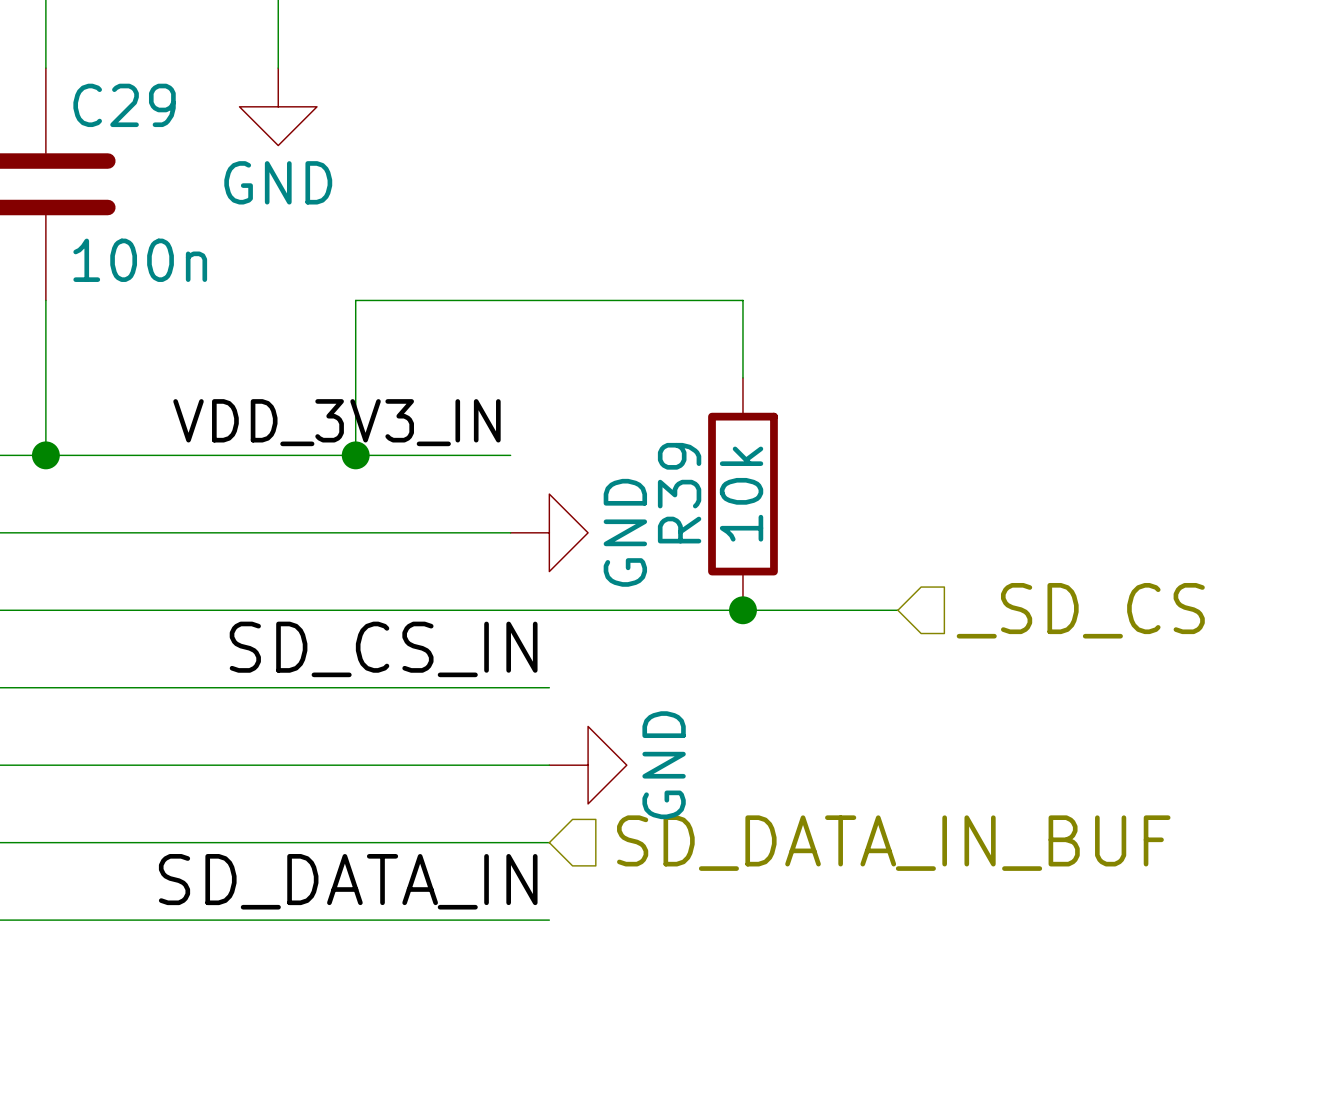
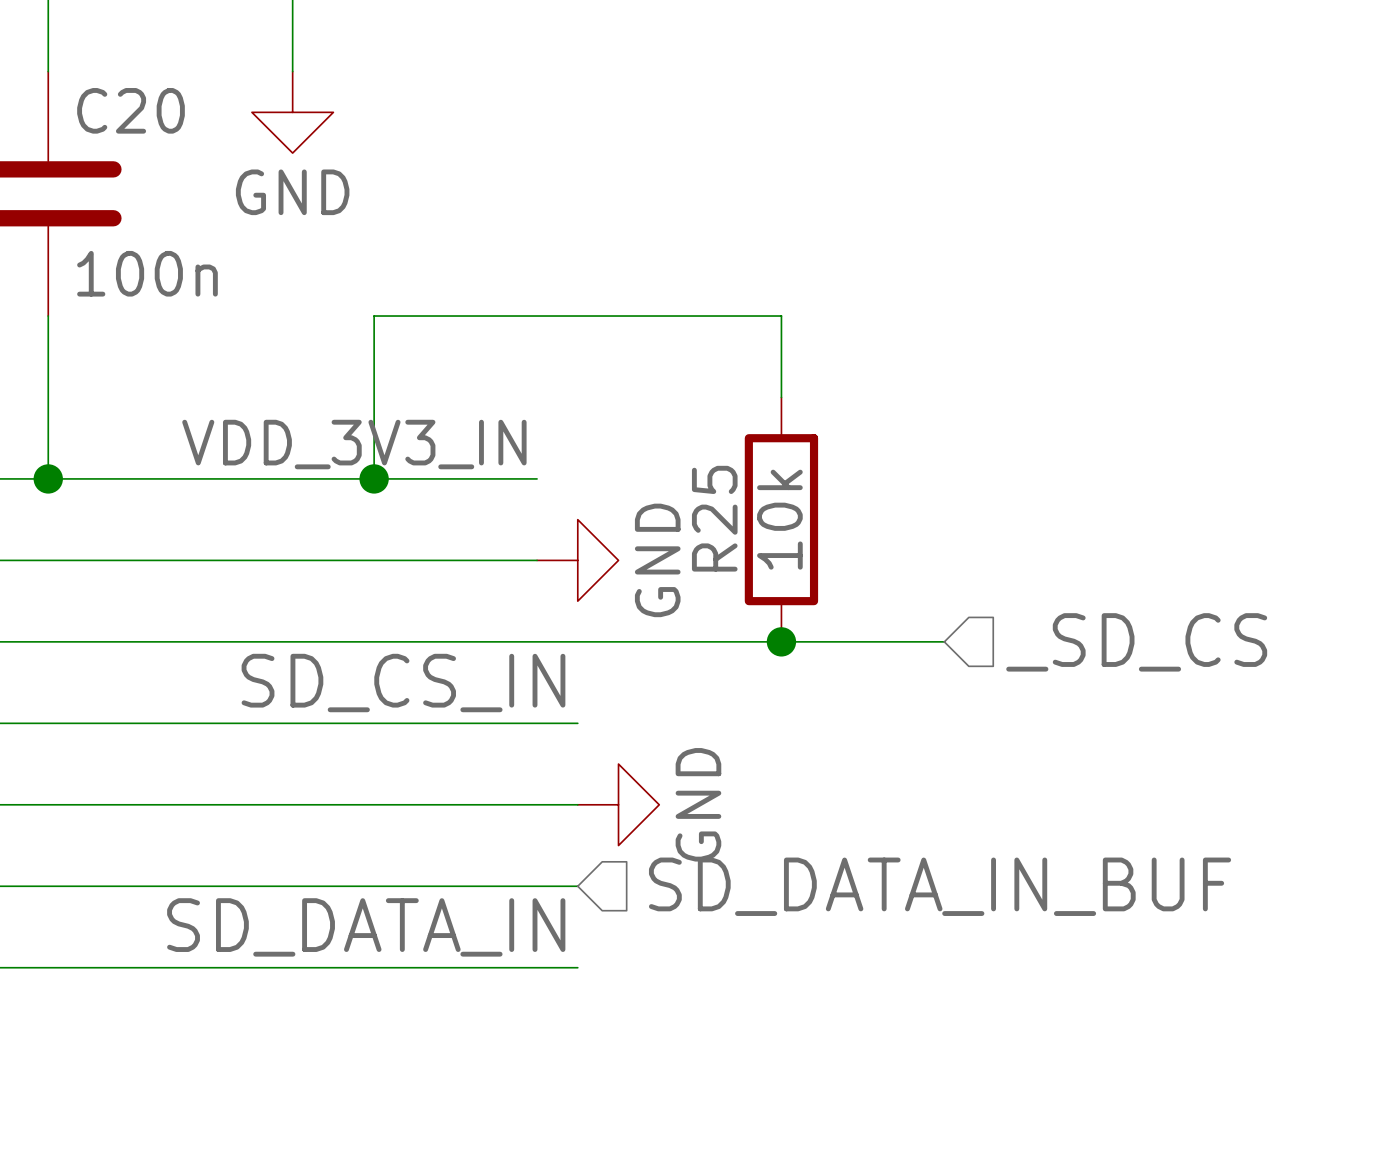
C29 name: C29 (124, 105) -> C20 (131, 110)
R39 name: R39 (679, 493) -> R25 (714, 518)

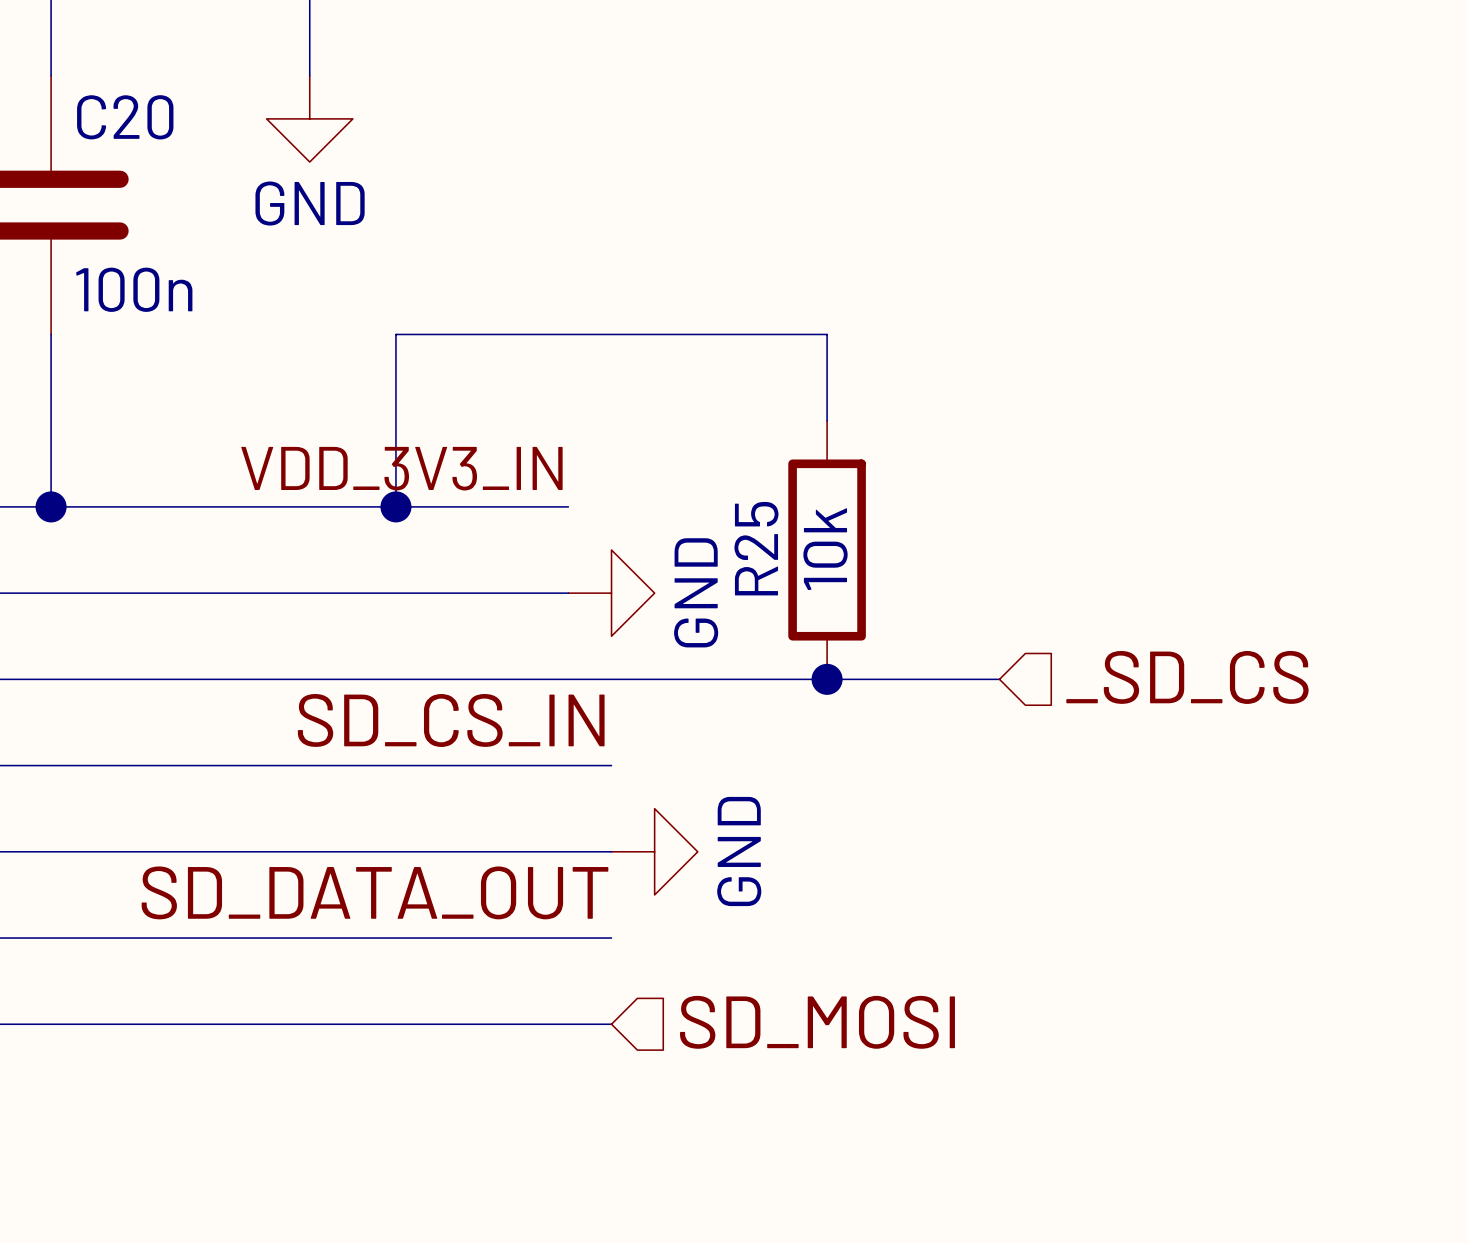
hierarchical label: SD_DATA_IN_BUF (940, 886) -> none
label: SD_DATA_IN (366, 927) -> SD_DATA_OUT (374, 892)
hierarchical label: none -> SD_MOSI (817, 1022)

